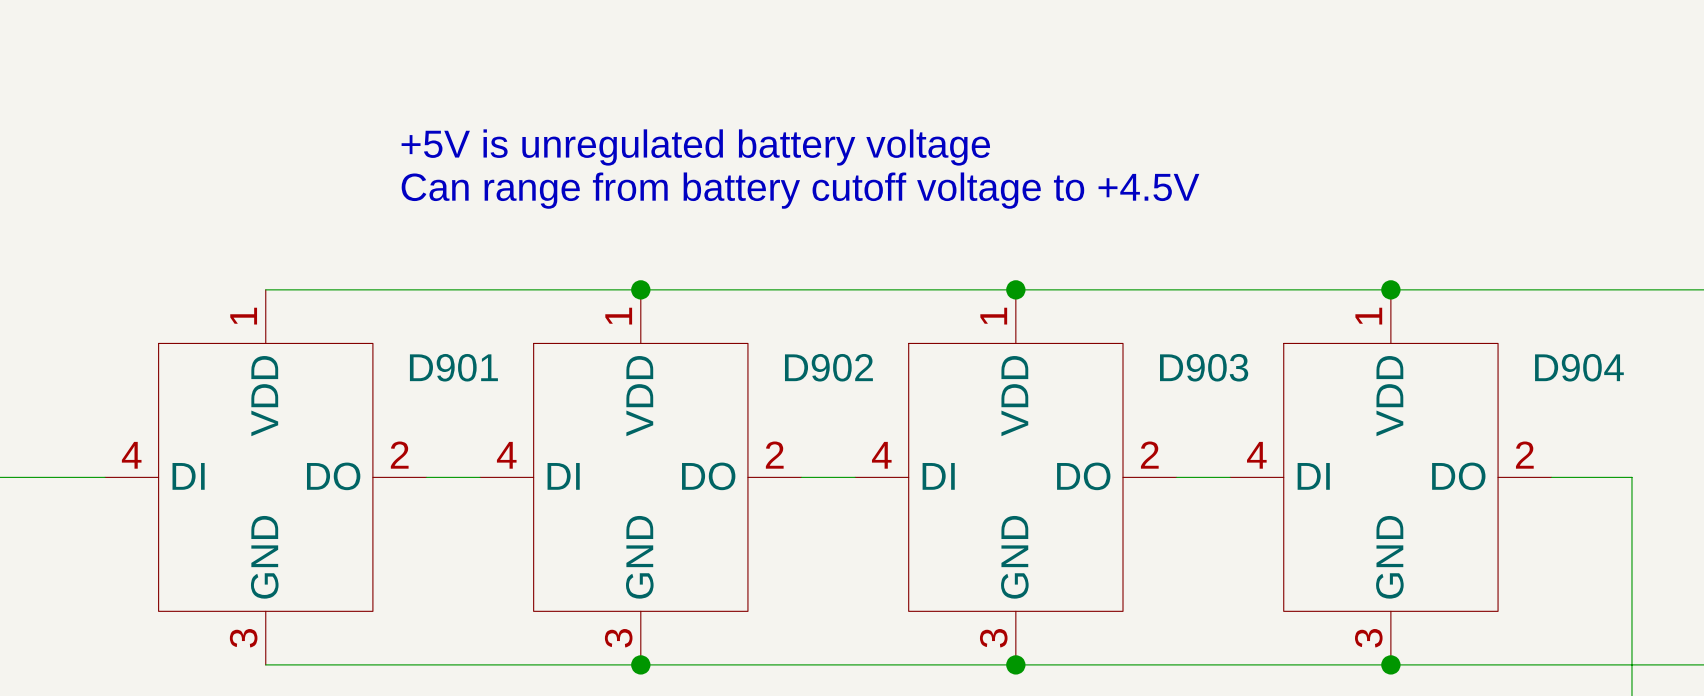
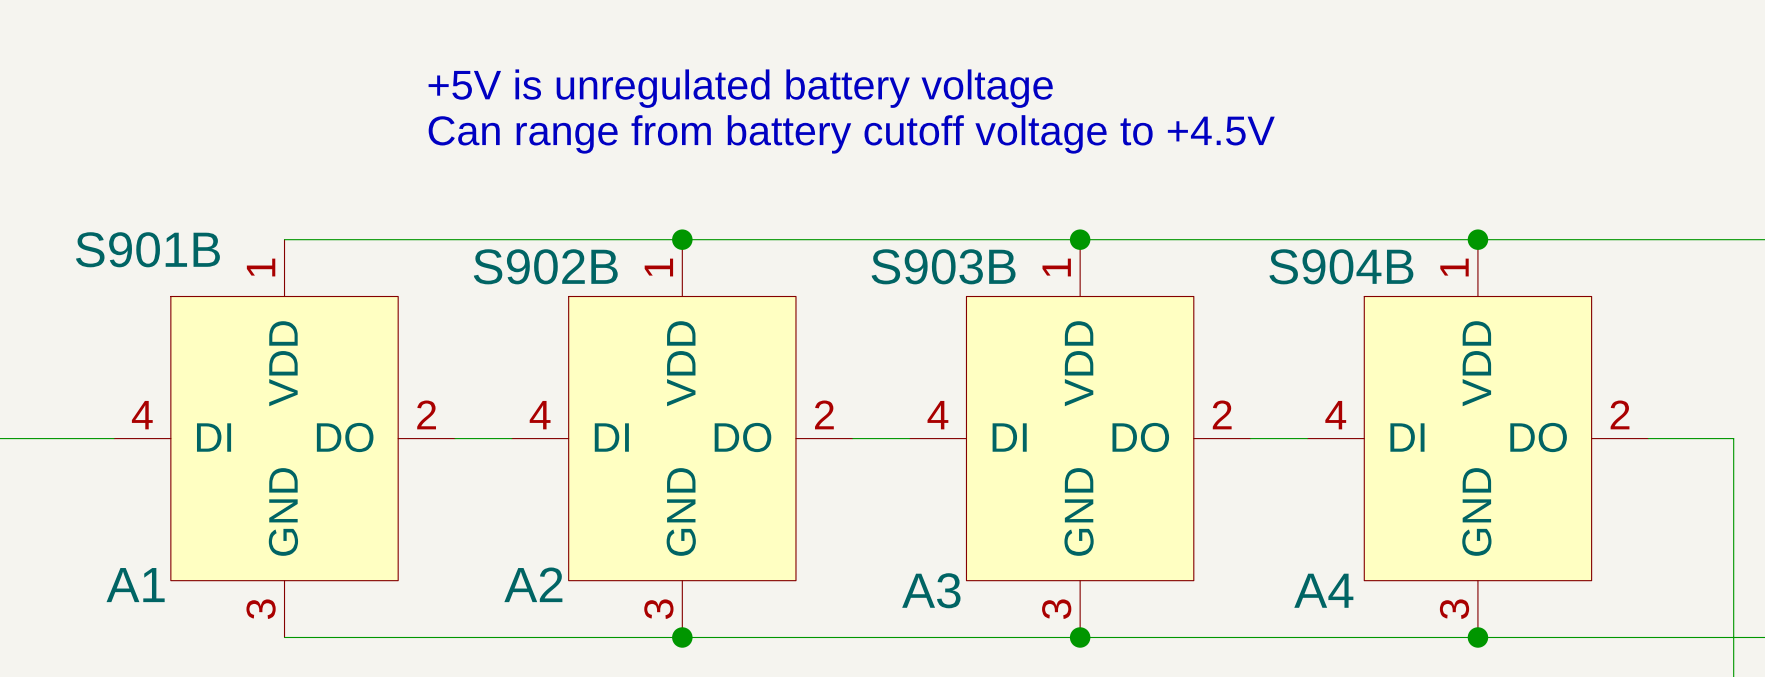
D901: (265, 477) -> none
S901B: none -> A1 (284, 438)
D902: (640, 477) -> none
S902B: none -> A2 (682, 438)
D903: (1015, 477) -> none
S903B: none -> A3 (1080, 438)
D904: (1390, 477) -> none
S904B: none -> A4 (1477, 438)

